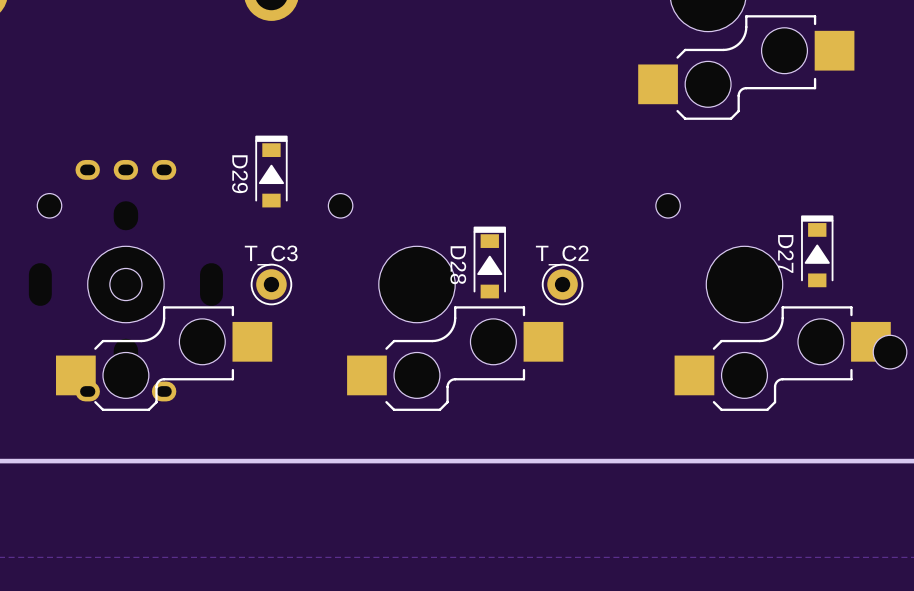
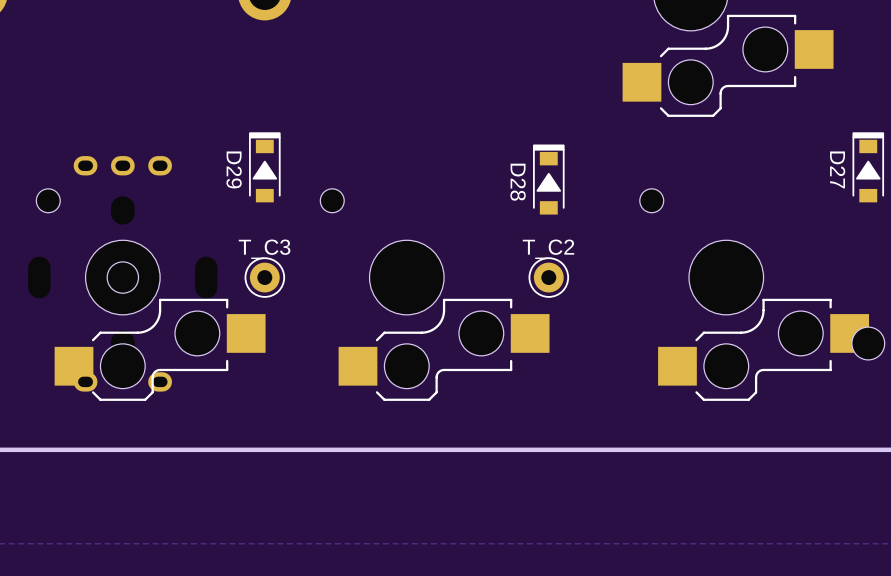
D27 position: (817, 251) -> (868, 167)
D28 position: (489, 262) -> (548, 179)

